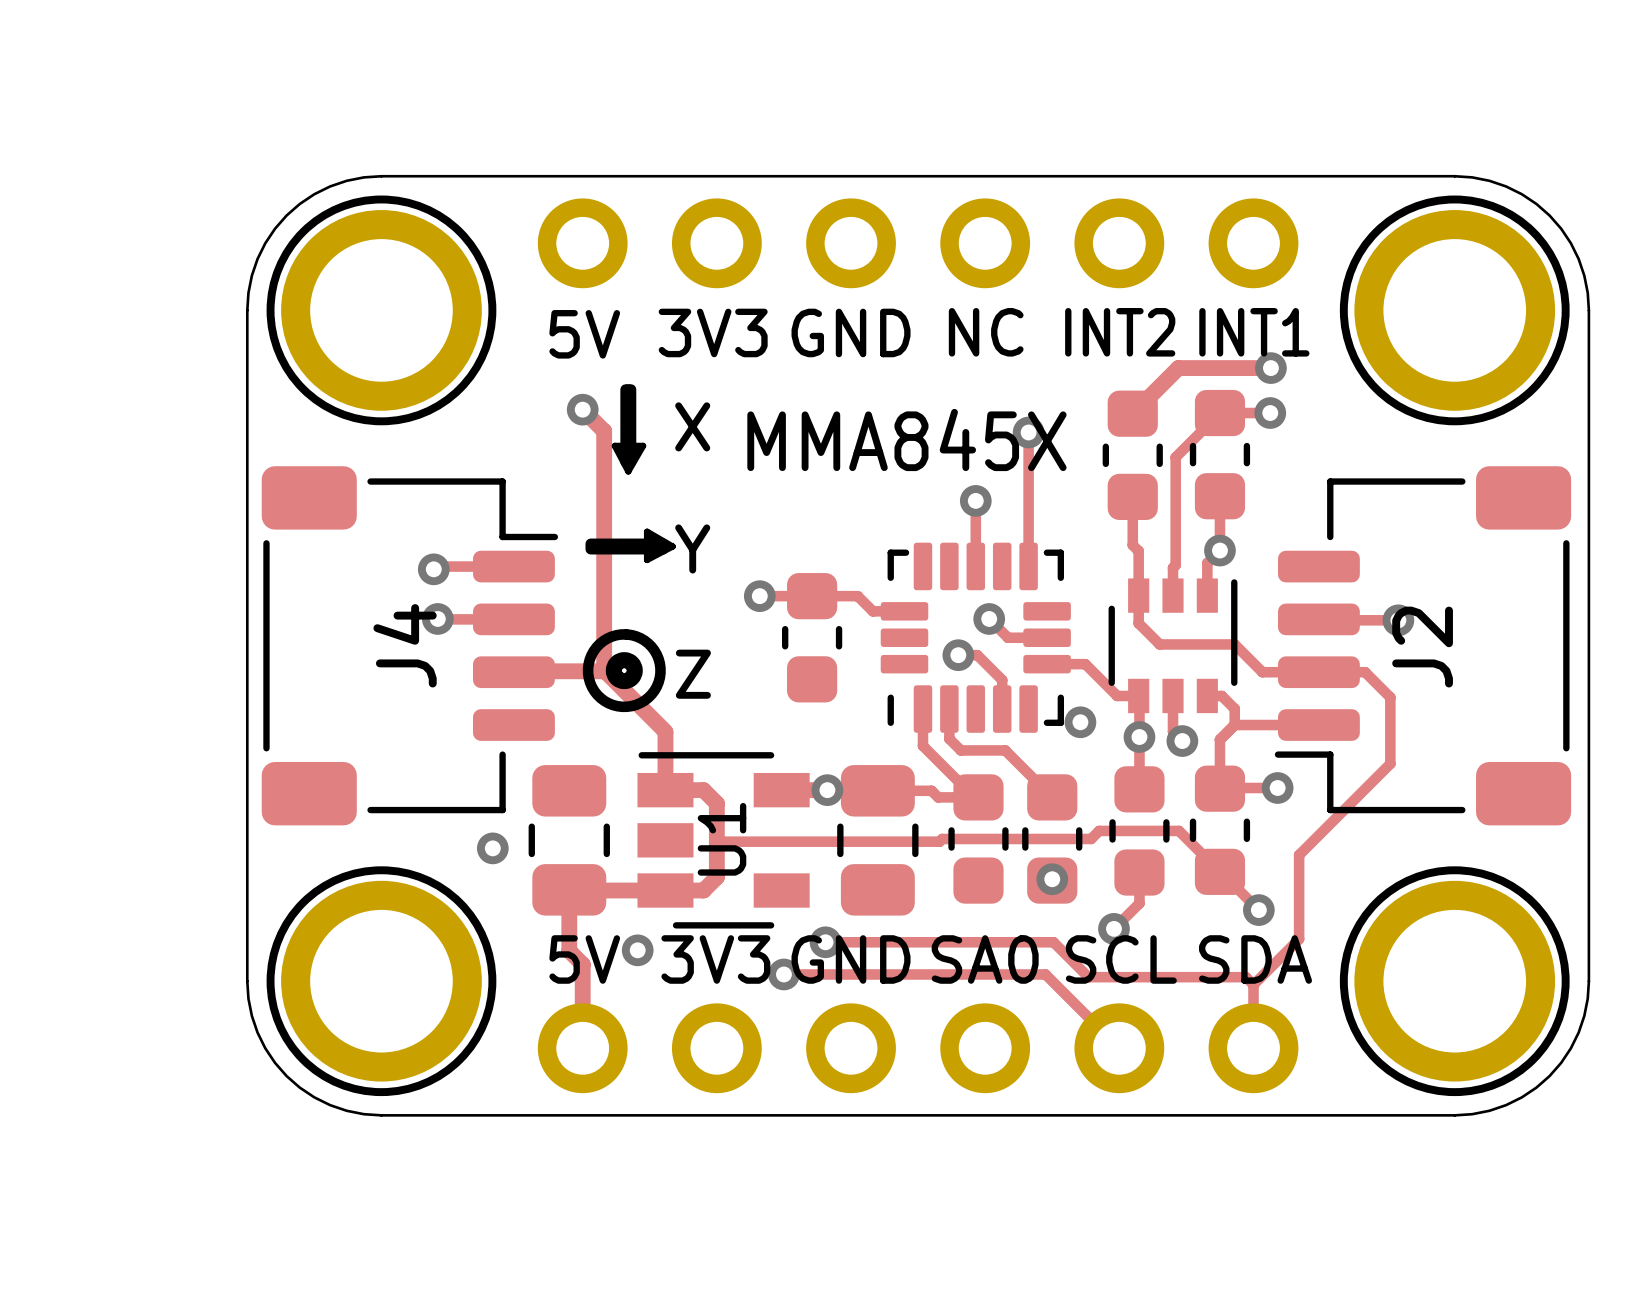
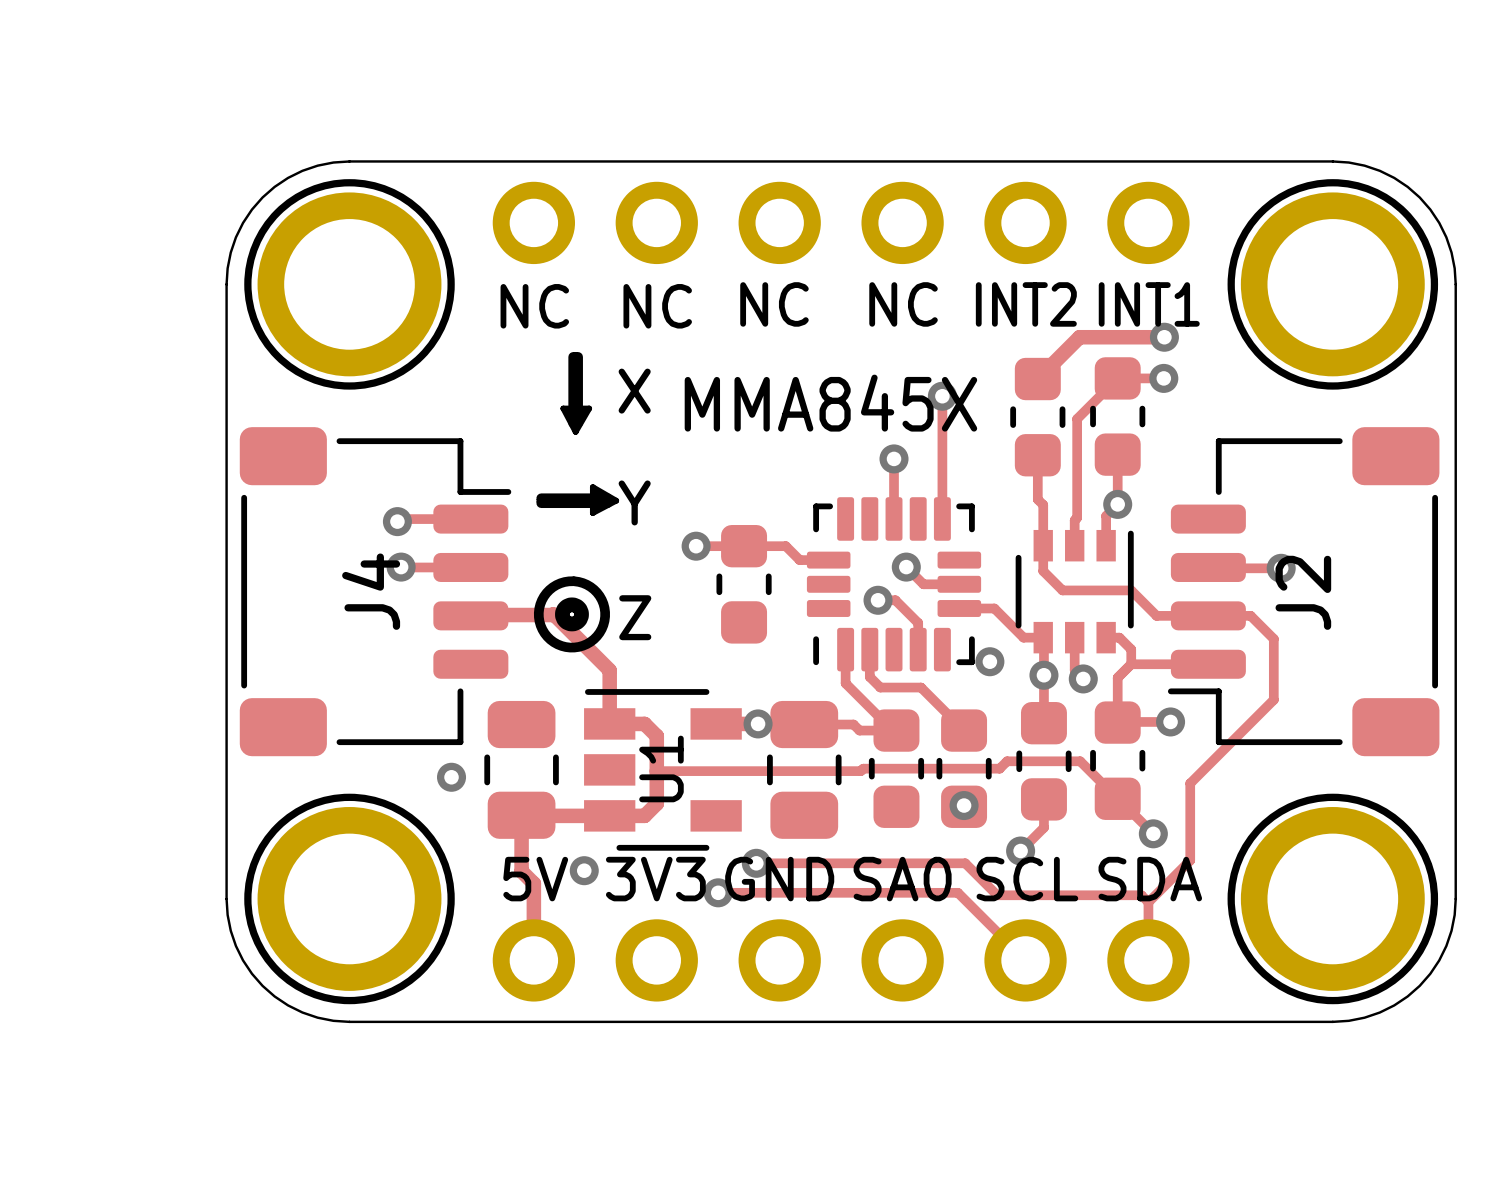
text: 3V3 (713, 332) -> NC (657, 306)
text: GND (851, 332) -> NC (774, 304)
text: 5V (584, 334) -> NC (534, 306)
track: (582, 409) (604, 431) (604, 671) -> none
via: (582, 409) -> none

